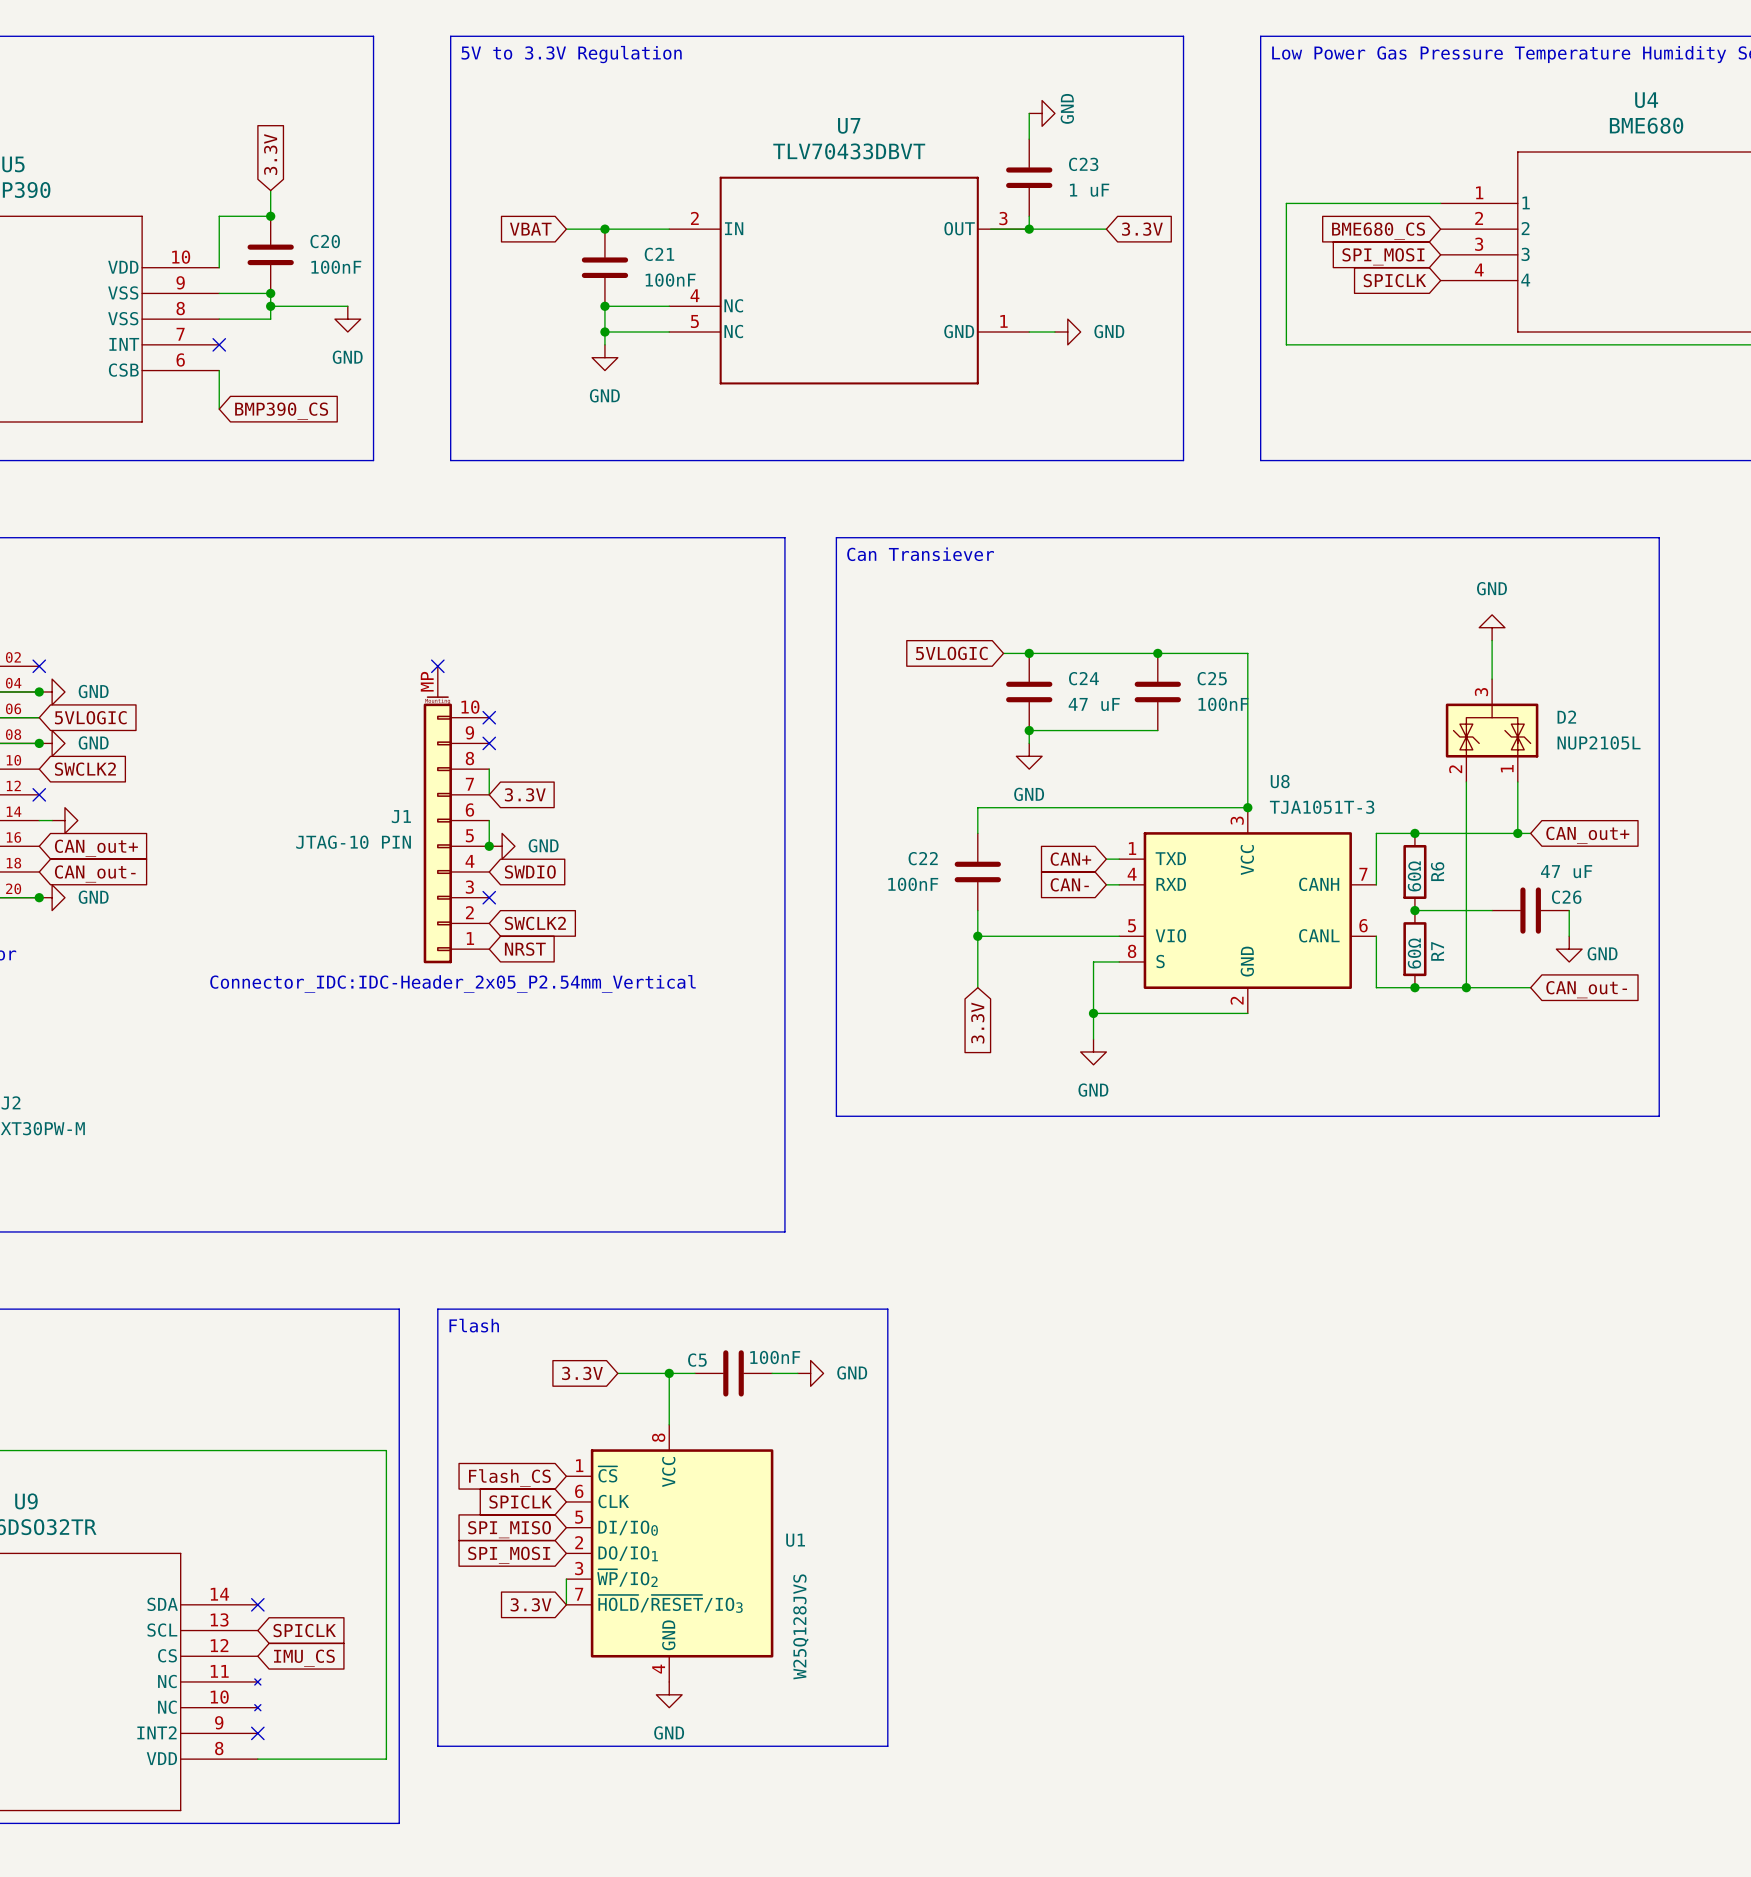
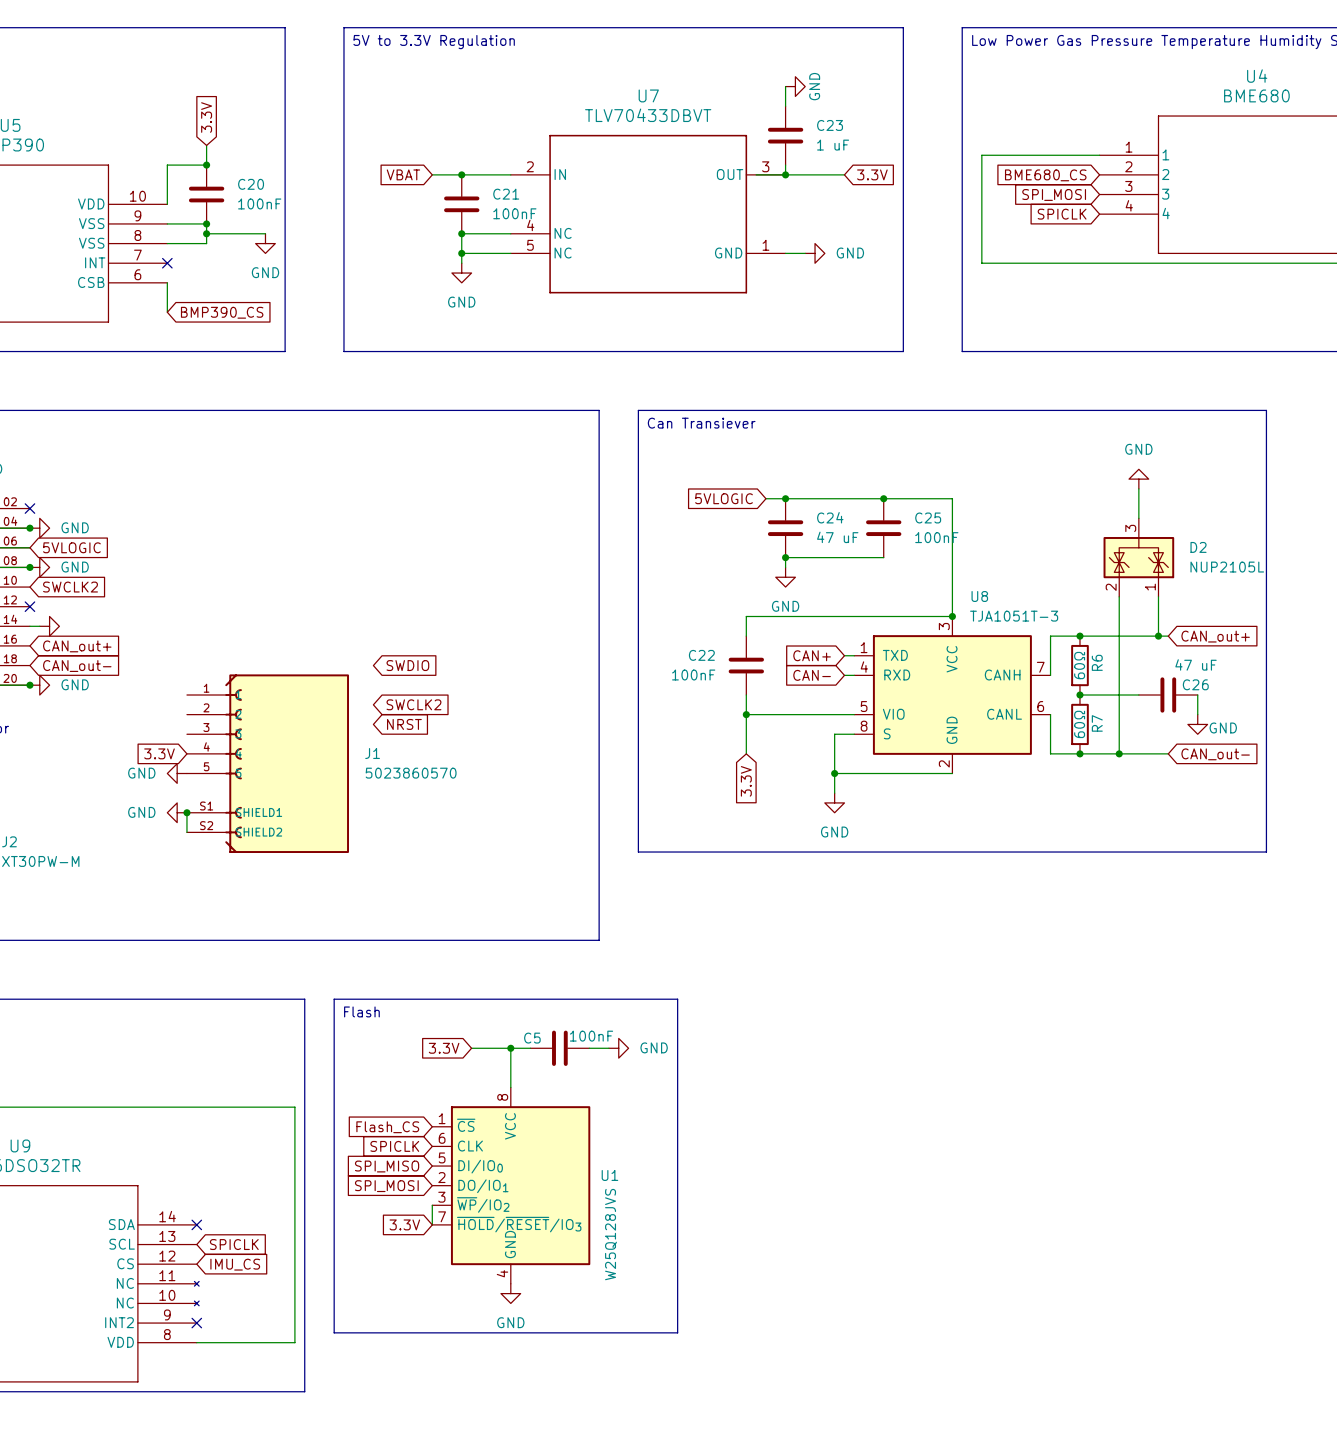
J1 symbol: [423, 666, 490, 964] -> [186, 674, 350, 853]
no-connect mark: (437, 666) -> none
no-connect mark: (489, 717) -> none
no-connect mark: (489, 743) -> none
wire: (489, 769) (489, 794) -> none
global label: 3.3V (525, 794) -> none
J1 name position: J1 (401, 816) -> J1 (372, 753)
wire: (489, 820) (489, 846) -> none
J1 value: JTAG-10 PIN (353, 842) -> 5023860570 (411, 773)
junction: (489, 846) -> none
power symbol: GND (502, 846) -> none
no-connect mark: (489, 897) -> none
text: Connector_IDC:IDC-Header_2x05_P2.54mm_Vertical (452, 983) -> none
global label: none -> 3.3V (159, 753)
power symbol: none -> GND (177, 773)
power symbol: none -> GND (177, 812)
wire: none -> (186, 812) (186, 832)
junction: none -> (186, 812)

